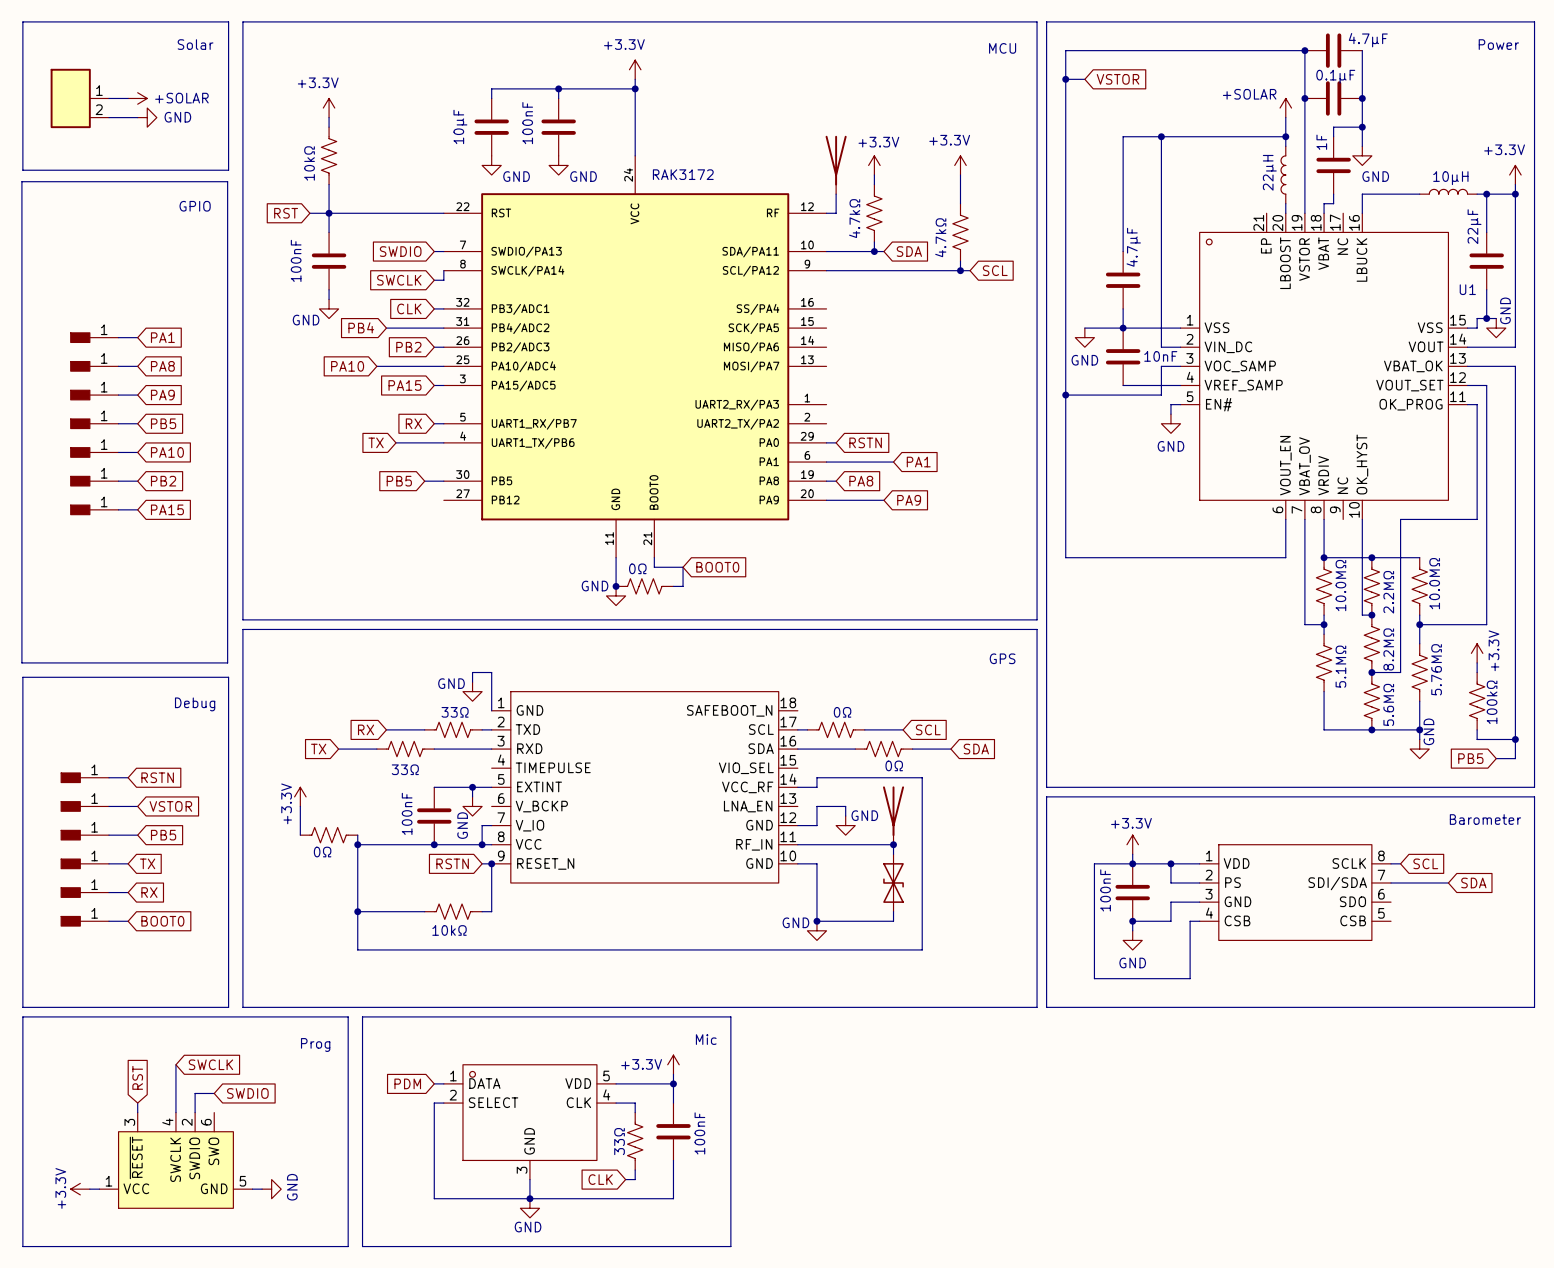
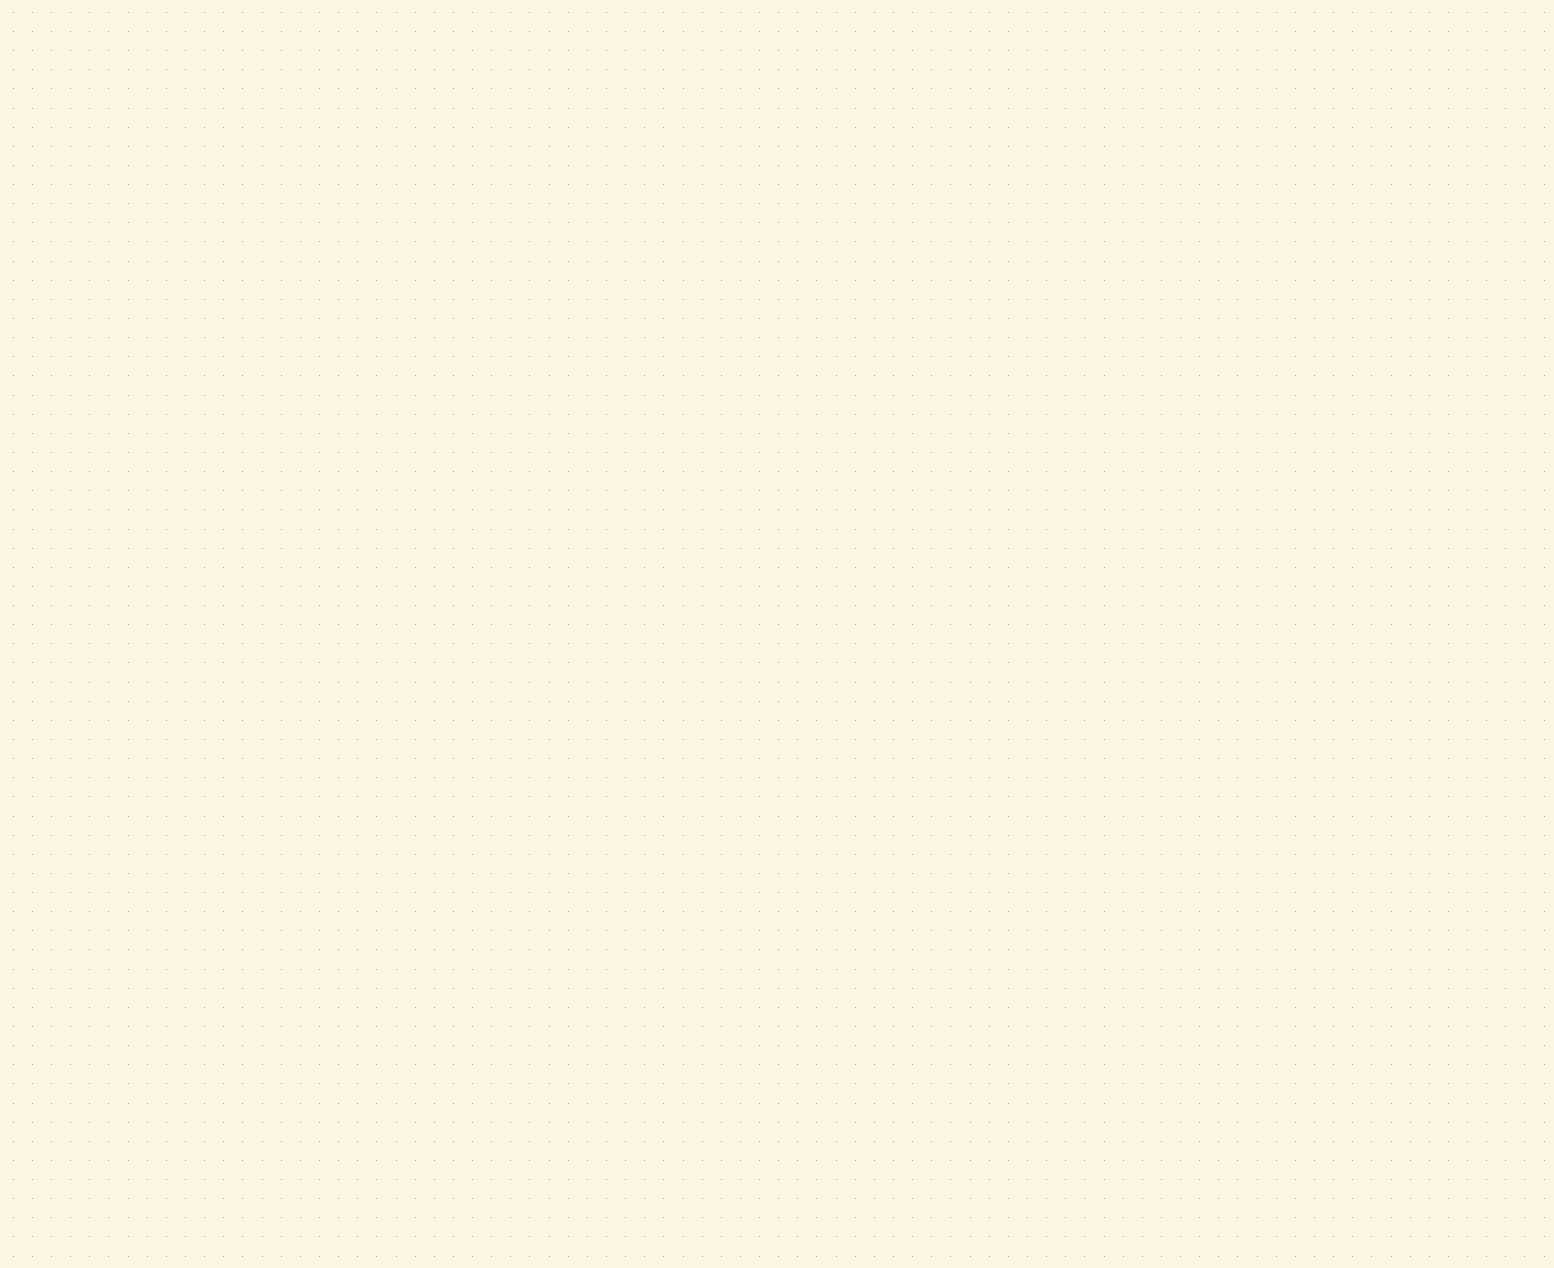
line: (22, 21) (228, 21) (228, 170) (22, 170) (22, 21) -> none
line: (242, 21) (1037, 21) (1037, 619) (242, 619) (242, 21) -> none
line: (1046, 21) (1534, 21) (1534, 787) (1046, 787) (1046, 21) -> none
text: Solar (195, 44) -> none
text: Power (1498, 44) -> none
text: MCU (1002, 48) -> none
junction: (1304, 50) -> none
part: 4.7μF (1333, 50) -> none
wire: (1362, 50) (1362, 146) -> none
power symbol: +3.3V (635, 69) -> none
wire: (635, 79) (635, 155) -> none
wire: (1065, 79) (1084, 79) -> none
junction: (1065, 79) -> none
global label: VSTOR (1118, 79) -> none
wire: (558, 88) (558, 98) -> none
junction: (558, 88) -> none
wire: (635, 88) (491, 88) (491, 98) -> none
junction: (635, 88) -> none
part: (79, 98) -> none
wire: (108, 98) (128, 98) -> none
power symbol: +SOLAR (137, 98) -> none
junction: (1304, 98) -> none
part: 0.1µF (1333, 98) -> none
junction: (1362, 98) -> none
power symbol: +3.3V (329, 108) -> none
power symbol: +SOLAR (1285, 108) -> none
wire: (108, 117) (137, 117) -> none
power symbol: GND (147, 117) -> none
wire: (329, 117) (329, 127) -> none
wire: (1285, 117) (1285, 146) -> none
part: 10μF (491, 127) -> none
part: 100nF (558, 127) -> none
wire: (1362, 127) (1333, 127) (1333, 136) -> none
junction: (1362, 127) -> none
wire: (1161, 136) (1161, 347) (1180, 347) -> none
junction: (1161, 136) -> none
wire: (1285, 136) (1123, 136) (1123, 251) -> none
junction: (1285, 136) -> none
part: 10kΩ (329, 155) -> none
power symbol: GND (1362, 155) -> none
part: (836, 164) -> none
power symbol: GND (491, 165) -> none
power symbol: GND (558, 165) -> none
power symbol: +3.3V (874, 165) -> none
power symbol: +3.3V (960, 165) -> none
part: 1F (1333, 165) -> none
wire: (874, 175) (874, 184) -> none
wire: (960, 175) (960, 203) -> none
part: 22µH (1283, 175) -> none
power symbol: +3.3V (1515, 175) -> none
line: (21, 181) (227, 181) (227, 662) (21, 662) (21, 181) -> none
wire: (329, 184) (329, 232) -> none
wire: (1515, 184) (1515, 347) (1467, 347) -> none
part: 10µH (1448, 191) -> none
wire: (836, 194) (836, 213) (826, 213) -> none
wire: (1333, 194) (1333, 203) (1324, 203) (1324, 213) -> none
wire: (1419, 194) (1362, 194) (1362, 213) -> none
wire: (1477, 194) (1515, 194) -> none
wire: (1486, 194) (1486, 232) -> none
junction: (1486, 194) -> none
junction: (1515, 194) -> none
wire: (1285, 203) (1285, 213) -> none
text: GPIO (195, 206) -> none
global label: RST (286, 213) -> none
wire: (309, 213) (443, 213) -> none
junction: (329, 213) -> none
part: 4.7kΩ (874, 213) -> none
wire: (1304, 213) (1304, 50) (1065, 50) (1065, 557) (1285, 557) (1285, 519) -> none
part: 4.7kΩ (960, 232) -> none
wire: (874, 241) (874, 251) -> none
global label: SWDIO (400, 251) -> none
wire: (434, 251) (443, 251) -> none
wire: (826, 251) (883, 251) -> none
junction: (874, 251) -> none
global label: SDA (909, 251) -> none
part: 100nF (329, 261) -> none
wire: (960, 261) (960, 270) -> none
part: 22µF (1486, 261) -> none
wire: (443, 270) (443, 280) (434, 280) -> none
wire: (826, 270) (970, 270) -> none
junction: (960, 270) -> none
global label: SCL (995, 270) -> none
global label: SWCLK (399, 280) -> none
part: 4.7μF (1123, 280) -> none
wire: (329, 289) (329, 299) -> none
wire: (1486, 289) (1486, 318) -> none
power symbol: GND (329, 308) -> none
global label: CLK (409, 308) -> none
wire: (434, 308) (443, 308) -> none
wire: (1123, 308) (1123, 328) -> none
junction: (1486, 318) -> none
wire: (1496, 318) (1477, 318) (1477, 328) (1467, 328) -> none
global label: PB4 (361, 327) -> none
wire: (386, 328) (443, 328) -> none
wire: (1084, 328) (1180, 328) -> none
junction: (1123, 328) -> none
power symbol: GND (1496, 328) -> none
part: (94, 337) -> none
wire: (118, 337) (137, 337) -> none
global label: PA1 (162, 337) -> none
power symbol: GND (1084, 337) -> none
global label: PB2 (408, 347) -> none
wire: (434, 347) (443, 347) -> none
part: RAK3172 (635, 356) -> none
part: 10nF (1123, 356) -> none
part: (94, 366) -> none
wire: (118, 366) (137, 366) -> none
global label: PA8 (162, 366) -> none
global label: PA10 (347, 366) -> none
wire: (376, 366) (443, 366) -> none
wire: (1180, 366) (1161, 366) (1161, 395) (1065, 395) -> none
U1: (1324, 366) -> none
wire: (1467, 366) (1515, 366) (1515, 758) (1496, 758) -> none
global label: PA15 (405, 385) -> none
wire: (434, 385) (443, 385) -> none
wire: (1123, 385) (1180, 385) -> none
wire: (1467, 385) (1486, 385) (1486, 624) (1419, 624) -> none
part: (94, 395) -> none
wire: (118, 395) (137, 395) -> none
global label: PA9 (162, 395) -> none
junction: (1065, 395) -> none
wire: (1180, 404) (1170, 404) (1170, 414) -> none
wire: (1467, 404) (1477, 404) (1477, 519) (1400, 519) (1400, 672) (1371, 672) -> none
part: (94, 423) -> none
wire: (118, 423) (137, 423) -> none
global label: PB5 (163, 423) -> none
global label: RX (413, 423) -> none
wire: (434, 423) (443, 423) -> none
power symbol: GND (1170, 423) -> none
global label: TX (376, 442) -> none
wire: (396, 442) (443, 442) -> none
wire: (826, 442) (836, 442) -> none
global label: RSTN (865, 442) -> none
part: (94, 452) -> none
wire: (118, 452) (137, 452) -> none
global label: PA10 (167, 452) -> none
wire: (826, 462) (893, 462) -> none
global label: PA1 (918, 462) -> none
part: (94, 481) -> none
wire: (118, 481) (137, 481) -> none
global label: PB2 (163, 481) -> none
global label: PB5 (399, 481) -> none
wire: (424, 481) (443, 481) -> none
wire: (826, 481) (836, 481) -> none
global label: PA8 (861, 481) -> none
wire: (826, 500) (883, 500) -> none
global label: PA9 (909, 500) -> none
part: (94, 509) -> none
wire: (118, 509) (137, 509) -> none
global label: PA15 (167, 509) -> none
wire: (1304, 519) (1304, 624) (1324, 624) -> none
wire: (1324, 519) (1324, 557) (1419, 557) -> none
wire: (1362, 519) (1362, 615) (1371, 615) -> none
wire: (616, 557) (616, 586) -> none
wire: (654, 557) (654, 567) (683, 567) (683, 586) (673, 586) -> none
junction: (1324, 557) -> none
junction: (1371, 557) -> none
global label: BOOT0 (717, 567) -> none
junction: (616, 586) -> none
part: 0Ω (644, 586) -> none
part: 10.0MΩ (1324, 586) -> none
part: 2.2MΩ (1371, 586) -> none
part: 10.0MΩ (1419, 586) -> none
power symbol: GND (616, 595) -> none
wire: (1324, 615) (1324, 634) -> none
junction: (1371, 615) -> none
wire: (1419, 615) (1419, 643) -> none
junction: (1324, 624) -> none
junction: (1419, 624) -> none
line: (242, 629) (1037, 629) (1037, 1007) (242, 1007) (242, 629) -> none
part: 8.2MΩ (1371, 643) -> none
power symbol: +3.3V (1477, 653) -> none
text: GPS (1002, 658) -> none
part: 5.1MΩ (1324, 662) -> none
wire: (1477, 662) (1477, 672) -> none
junction: (1371, 672) -> none
part: 5.76MΩ (1419, 672) -> none
line: (22, 677) (22, 1007) (228, 1007) (228, 677) (22, 677) -> none
wire: (472, 682) (472, 672) (491, 672) (491, 710) -> none
power symbol: GND (472, 691) -> none
wire: (1324, 691) (1324, 729) (1419, 729) -> none
part: 5.6MΩ (1371, 701) -> none
wire: (1419, 701) (1419, 739) -> none
part: 100kΩ (1477, 701) -> none
text: Debug (195, 704) -> none
global label: RX (366, 729) -> none
wire: (386, 729) (424, 729) -> none
part: 33Ω (453, 729) -> none
wire: (482, 729) (491, 729) -> none
wire: (797, 729) (807, 729) -> none
part: 0Ω (836, 729) -> none
wire: (864, 729) (903, 729) -> none
global label: SCL (928, 729) -> none
junction: (1371, 729) -> none
junction: (1419, 729) -> none
wire: (1477, 729) (1477, 739) (1515, 739) -> none
junction: (1515, 739) -> none
global label: TX (318, 749) -> none
wire: (338, 749) (376, 749) -> none
part: 33Ω (405, 749) -> none
wire: (434, 749) (491, 749) -> none
wire: (797, 749) (855, 749) -> none
part: 0Ω (883, 749) -> none
wire: (912, 749) (950, 749) -> none
global label: SDA (976, 749) -> none
power symbol: GND (1419, 749) -> none
global label: PB5 (1470, 758) -> none
part: (84, 777) -> none
wire: (108, 777) (128, 777) -> none
global label: RSTN (157, 777) -> none
wire: (434, 787) (491, 787) -> none
wire: (472, 787) (472, 796) -> none
junction: (472, 787) -> none
part: (644, 787) -> none
wire: (797, 787) (816, 787) (816, 777) (922, 777) (922, 949) (357, 949) (357, 835) -> none
power symbol: +3.3V (300, 796) -> none
line: (1046, 796) (1046, 1007) (1534, 1007) (1534, 796) (1046, 796) -> none
part: (84, 806) -> none
wire: (108, 806) (137, 806) -> none
global label: VSTOR (170, 806) -> none
wire: (300, 806) (300, 835) -> none
power symbol: GND (472, 806) -> none
part: (893, 815) -> none
part: 100nF (434, 816) -> none
wire: (845, 816) (845, 806) (816, 806) (816, 825) (797, 825) -> none
text: Barometer (1485, 819) -> none
wire: (491, 825) (482, 825) (482, 844) -> none
power symbol: GND (845, 825) -> none
part: (84, 835) -> none
wire: (108, 835) (137, 835) -> none
global label: PB5 (163, 835) -> none
part: 0Ω (329, 835) -> none
wire: (357, 844) (491, 844) -> none
junction: (357, 844) -> none
junction: (434, 844) -> none
junction: (482, 844) -> none
wire: (797, 844) (893, 844) (893, 854) -> none
junction: (893, 844) -> none
power symbol: +3.3V (1132, 844) -> none
wire: (1132, 854) (1132, 863) -> none
part: (84, 863) -> none
wire: (108, 863) (128, 863) -> none
global label: TX (147, 863) -> none
global label: RSTN (452, 863) -> none
wire: (482, 863) (491, 863) (491, 911) (482, 911) -> none
junction: (491, 863) -> none
wire: (797, 863) (816, 863) (816, 921) (893, 921) (893, 911) -> none
junction: (1132, 863) -> none
wire: (1170, 863) (1170, 882) (1199, 882) -> none
junction: (1170, 863) -> none
wire: (1199, 863) (1094, 863) (1094, 978) (1190, 978) (1190, 921) (1199, 921) -> none
wire: (1391, 863) (1400, 863) -> none
global label: SCL (1425, 863) -> none
part: (893, 882) -> none
wire: (1391, 882) (1448, 882) -> none
global label: SDA (1473, 882) -> none
part: (84, 892) -> none
wire: (108, 892) (128, 892) -> none
global label: RX (149, 892) -> none
part: 100nF (1132, 892) -> none
part: (1295, 892) -> none
wire: (1199, 902) (1170, 902) (1170, 921) (1132, 921) (1132, 930) -> none
wire: (357, 911) (424, 911) -> none
junction: (357, 911) -> none
part: 10kΩ (453, 911) -> none
part: (84, 921) -> none
wire: (108, 921) (128, 921) -> none
global label: BOOT0 (162, 921) -> none
junction: (816, 921) -> none
junction: (1132, 921) -> none
power symbol: GND (816, 930) -> none
power symbol: GND (1132, 940) -> none
line: (22, 1016) (348, 1016) (348, 1246) (22, 1246) (22, 1016) -> none
line: (362, 1016) (730, 1016) (730, 1246) (362, 1246) (362, 1016) -> none
text: Mic (706, 1039) -> none
text: Prog (315, 1044) -> none
wire: (175, 1064) (175, 1112) -> none
global label: SWCLK (210, 1064) -> none
power symbol: +3.3V (673, 1064) -> none
wire: (673, 1074) (673, 1103) -> none
global label: RST (137, 1077) -> none
global label: PDM (407, 1083) -> none
wire: (434, 1083) (443, 1083) -> none
wire: (616, 1083) (673, 1083) -> none
junction: (673, 1083) -> none
wire: (214, 1093) (195, 1093) (195, 1112) -> none
global label: SWDIO (247, 1093) -> none
wire: (137, 1103) (137, 1112) -> none
wire: (443, 1103) (434, 1103) (434, 1198) (673, 1198) (673, 1160) -> none
wire: (616, 1103) (635, 1103) (635, 1112) -> none
part: (529, 1122) -> none
part: 100nF (673, 1131) -> none
part: 33Ω (635, 1141) -> none
part: (175, 1160) -> none
wire: (635, 1170) (635, 1179) (625, 1179) -> none
wire: (529, 1179) (529, 1198) -> none
global label: CLK (600, 1179) -> none
power symbol: +3.3V (80, 1189) -> none
wire: (89, 1189) (99, 1189) -> none
wire: (252, 1189) (262, 1189) -> none
power symbol: GND (271, 1189) -> none
junction: (529, 1198) -> none
power symbol: GND (529, 1208) -> none

